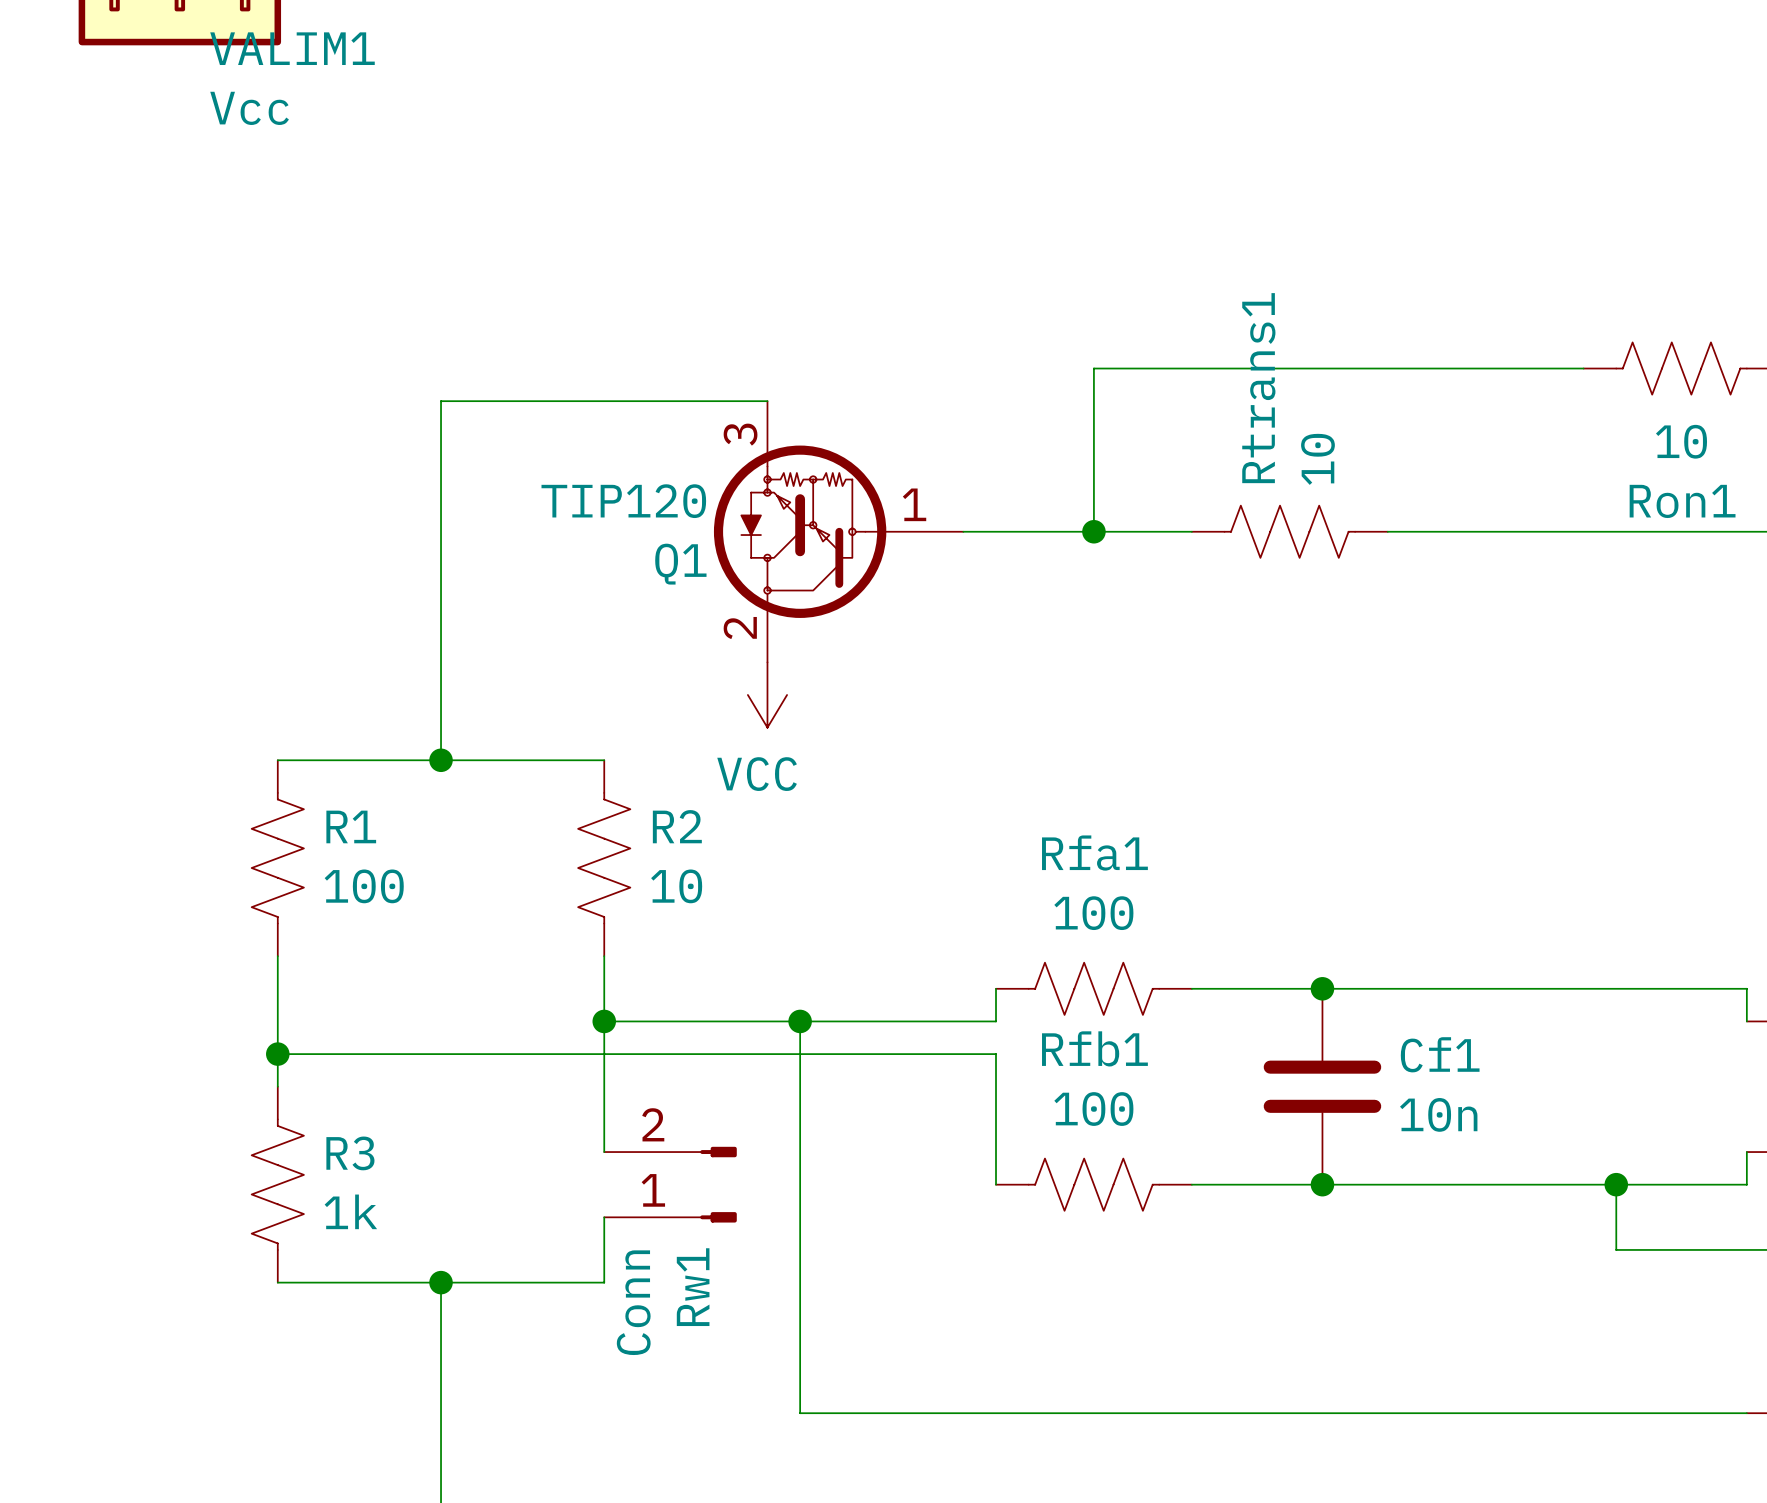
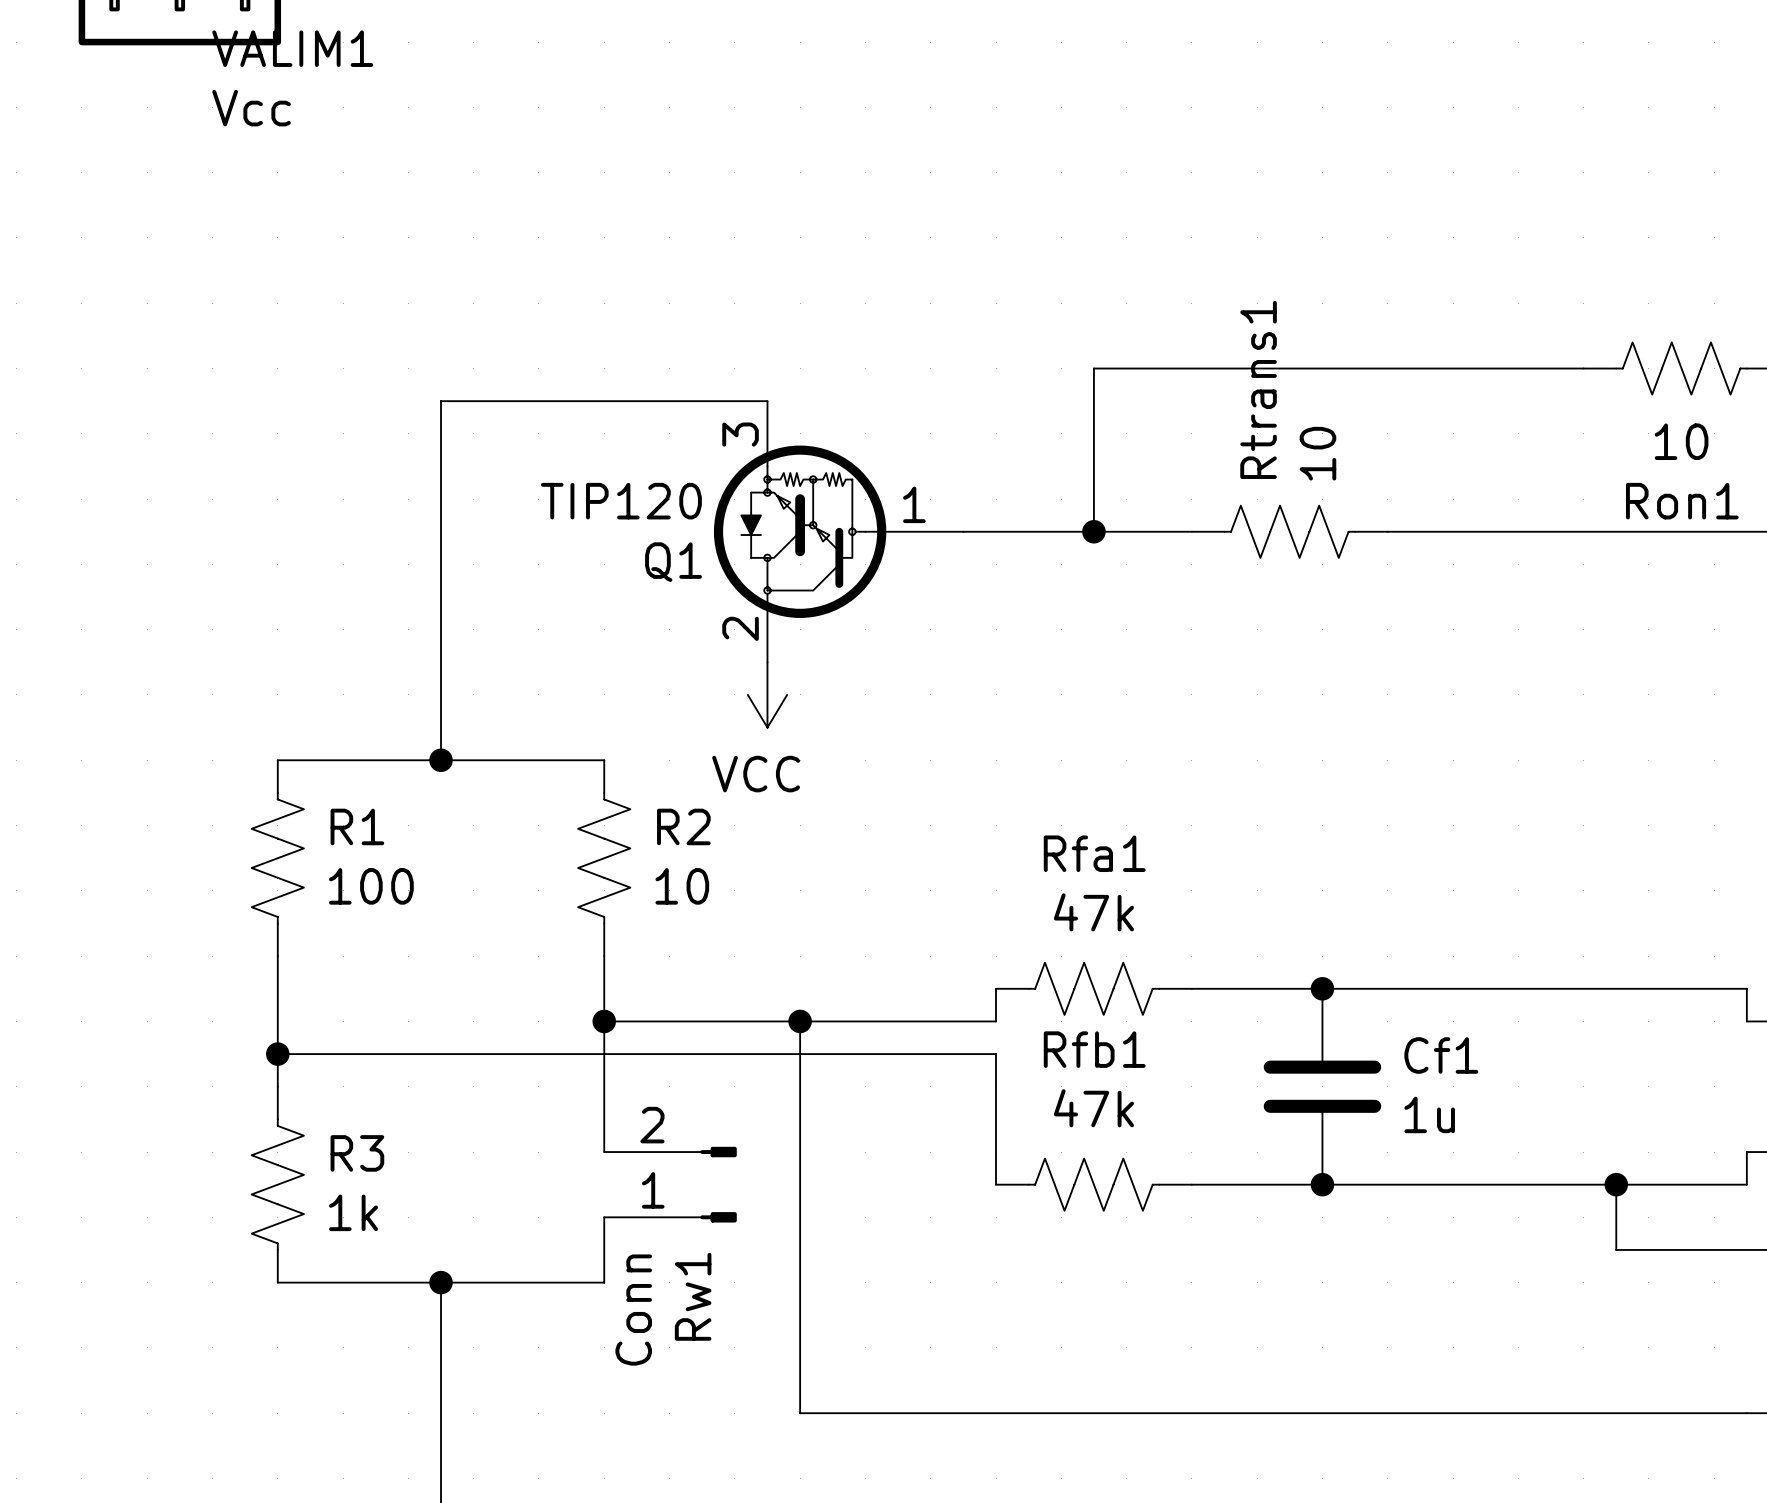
Rfa1 value: 100 (1093, 913) -> 47k (1093, 912)
Rfb1 value: 100 (1093, 1109) -> 47k (1093, 1108)
Cf1 value: 10n (1438, 1114) -> 1u (1429, 1114)

